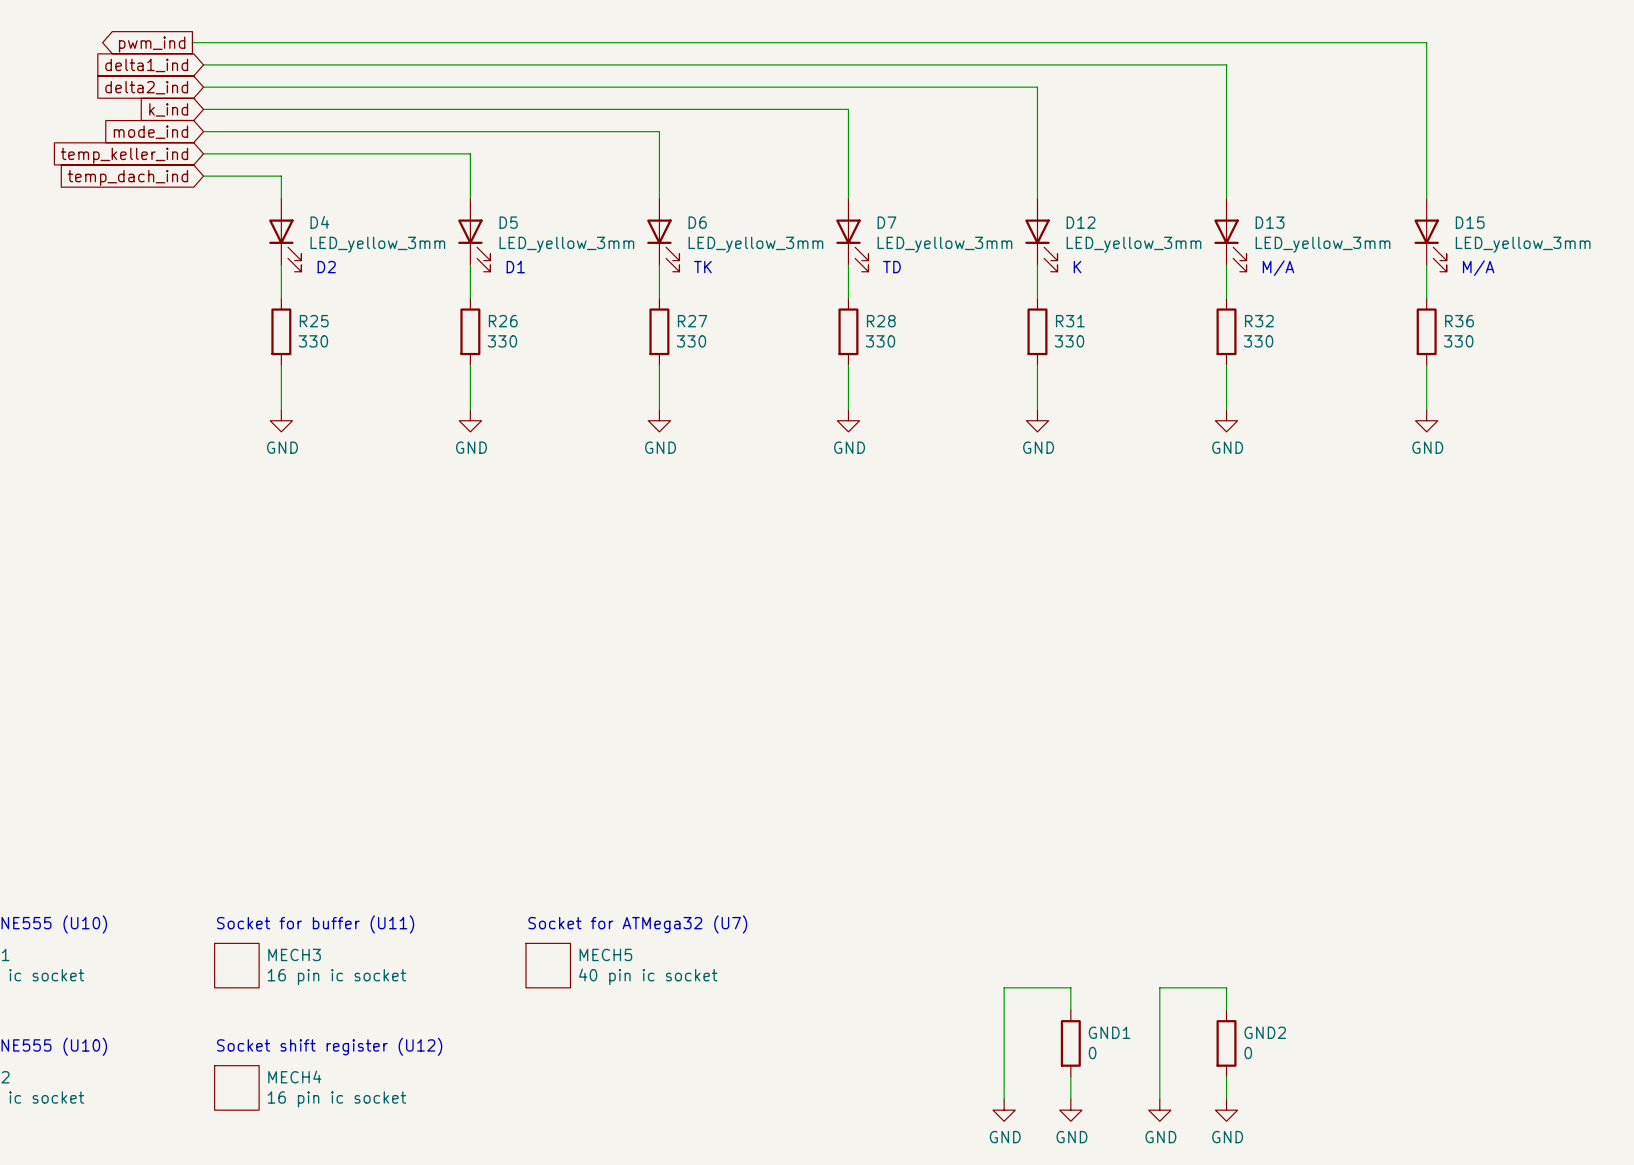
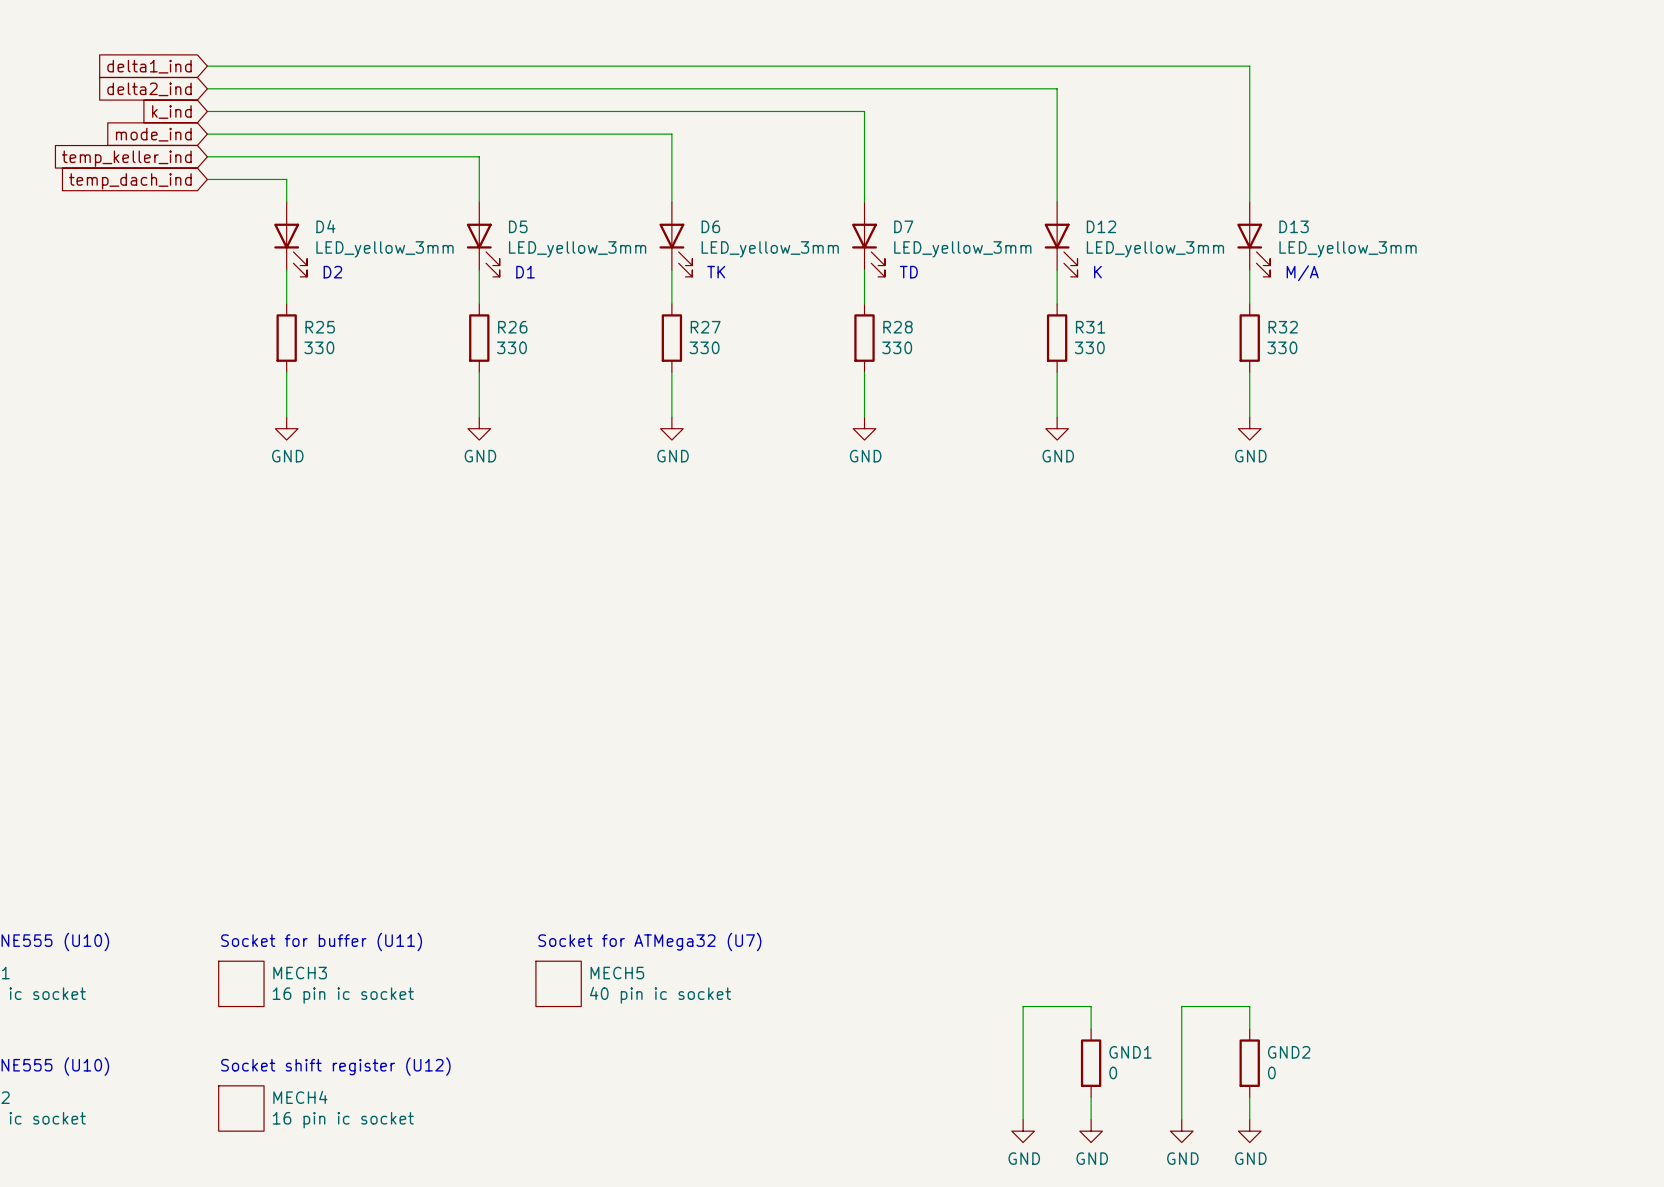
wire: (192, 42) (1426, 42) (1426, 198) -> none
global label: pwm_ind (152, 44) -> none
D15: LED_yellow_3mm (1430, 235) -> none
wire: (1426, 265) (1426, 298) -> none
text: M/A (1478, 268) -> none
R36: 330 (1426, 331) -> none
wire: (1426, 365) (1426, 409) -> none
power symbol: GND (1426, 420) -> none

